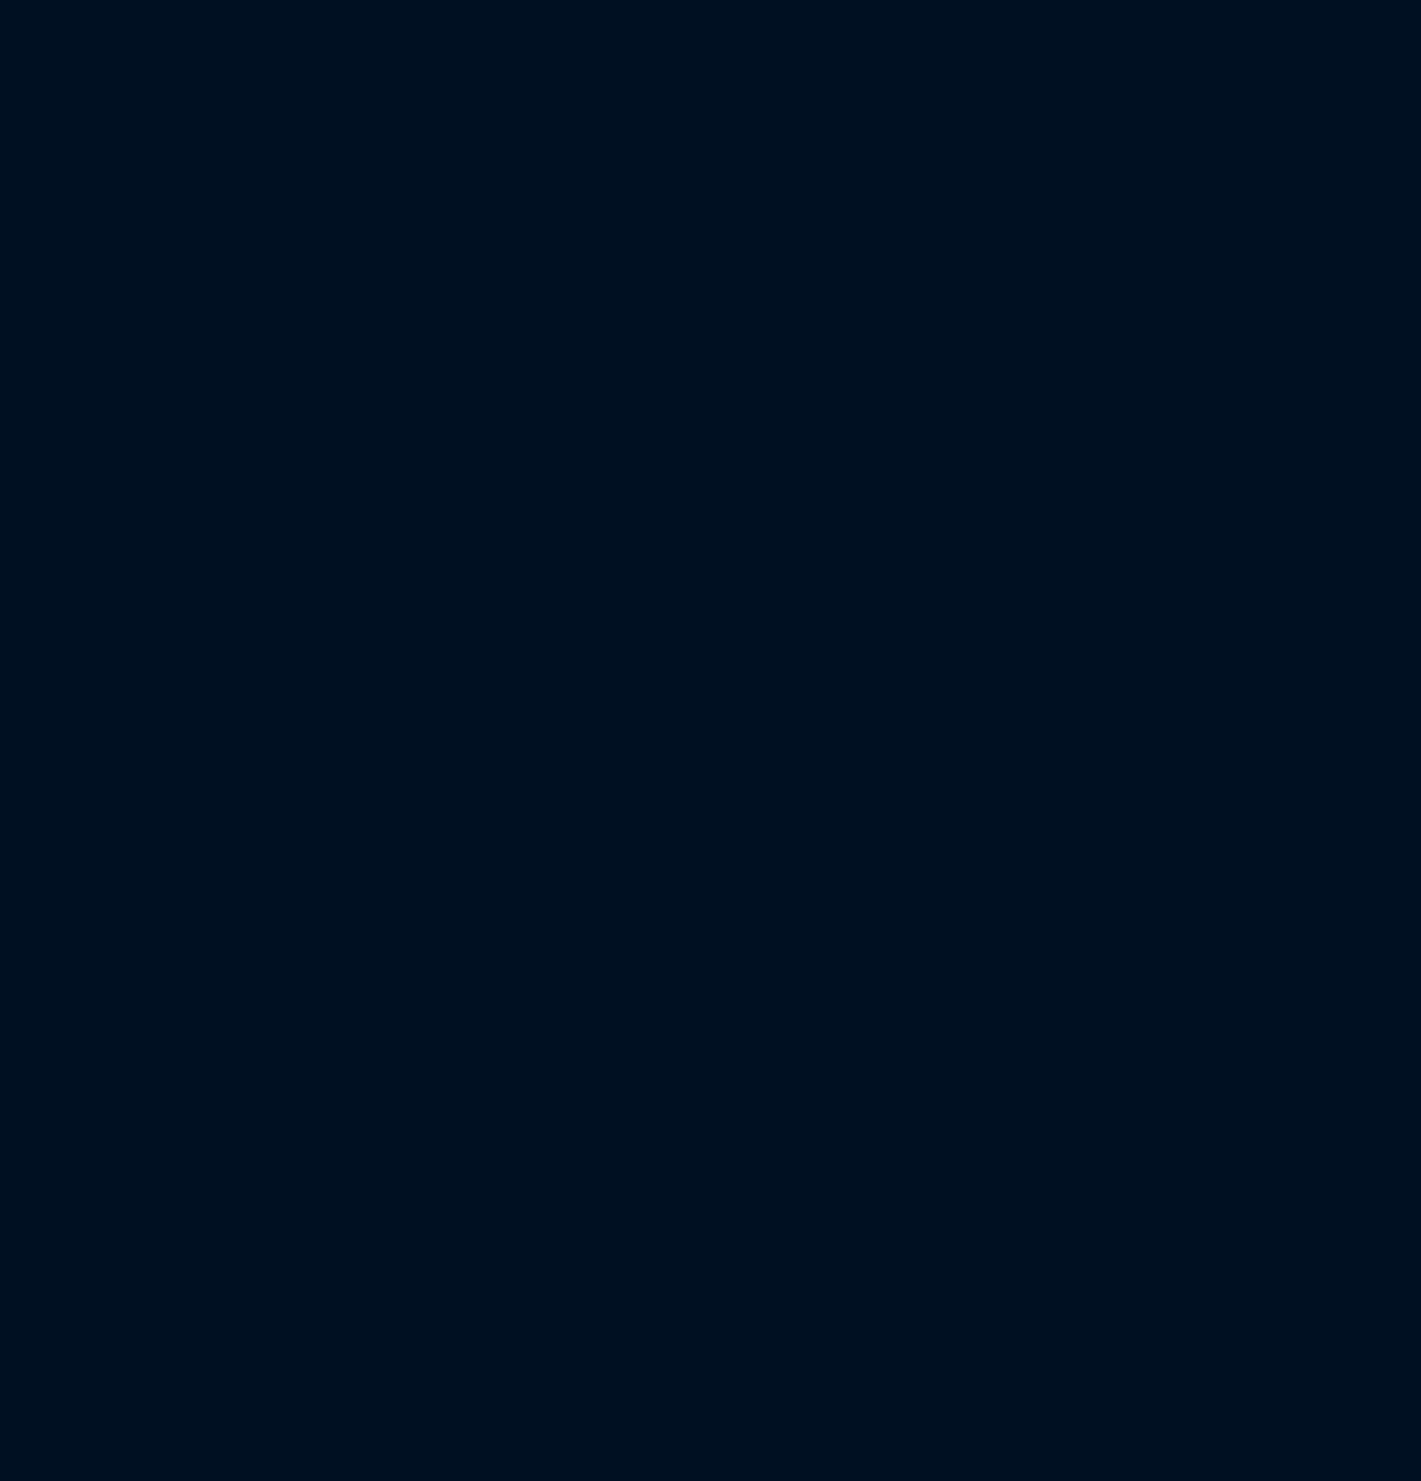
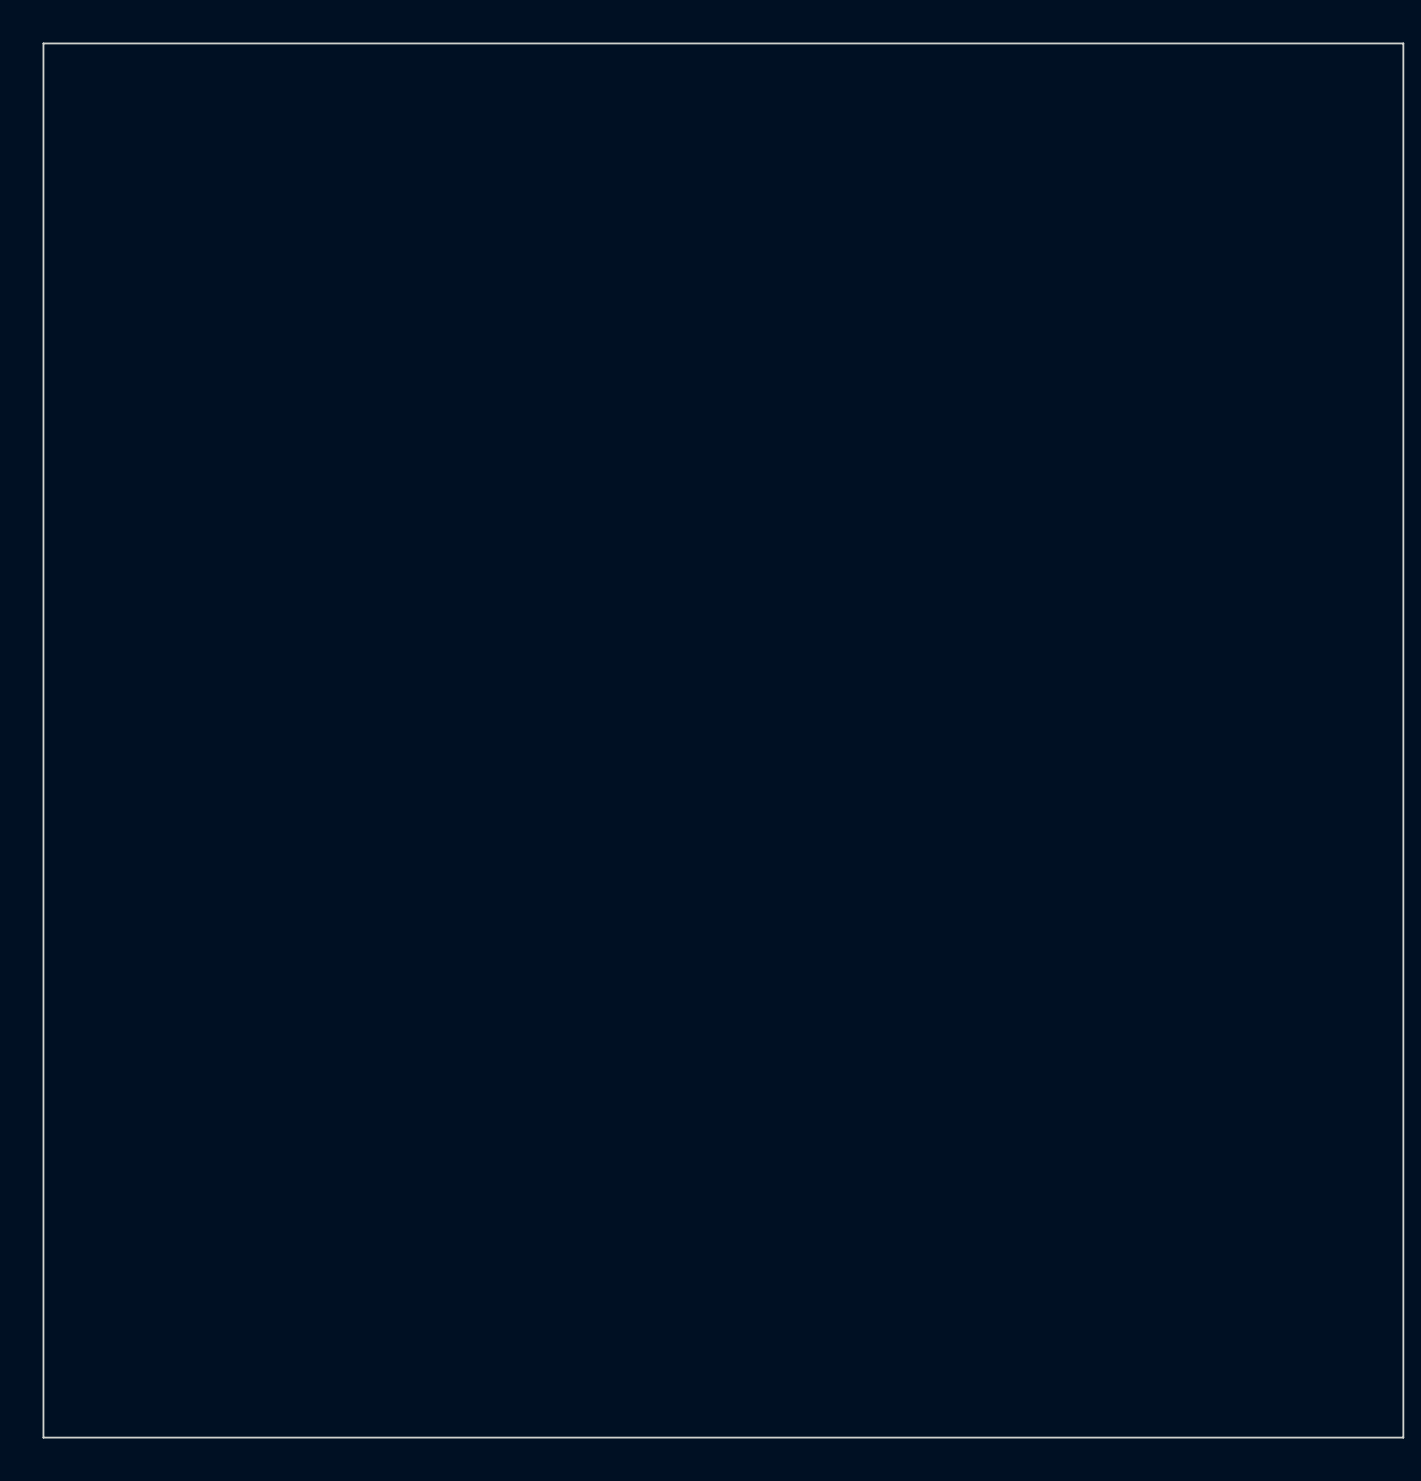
board edge: none -> (43, 43) (1403, 43) (1403, 1437) (43, 1437) (43, 43)

